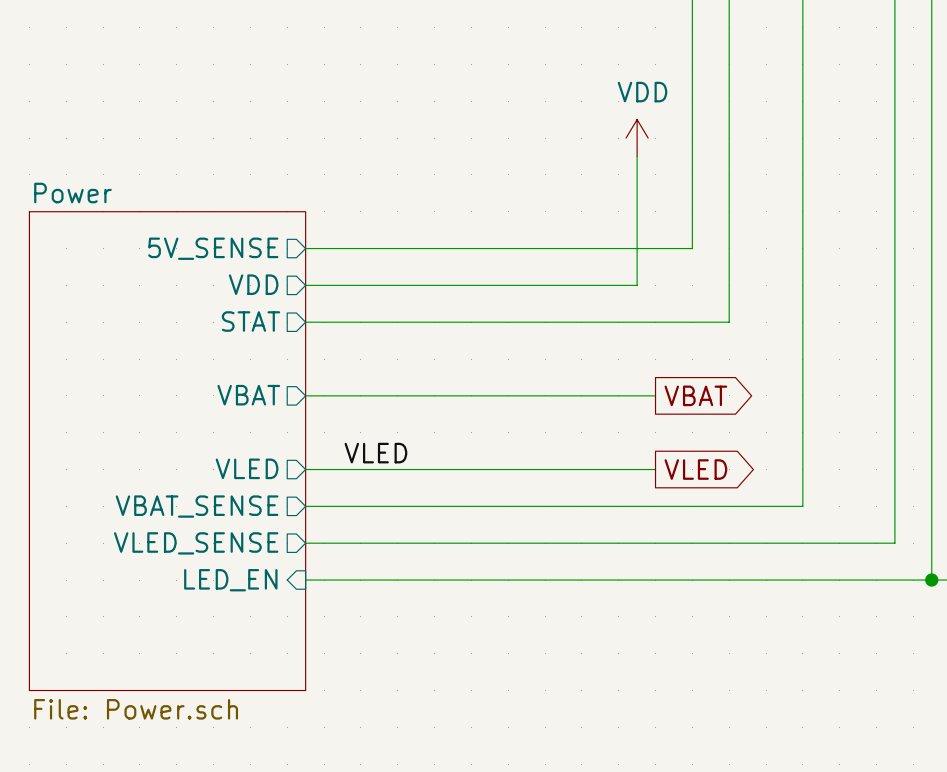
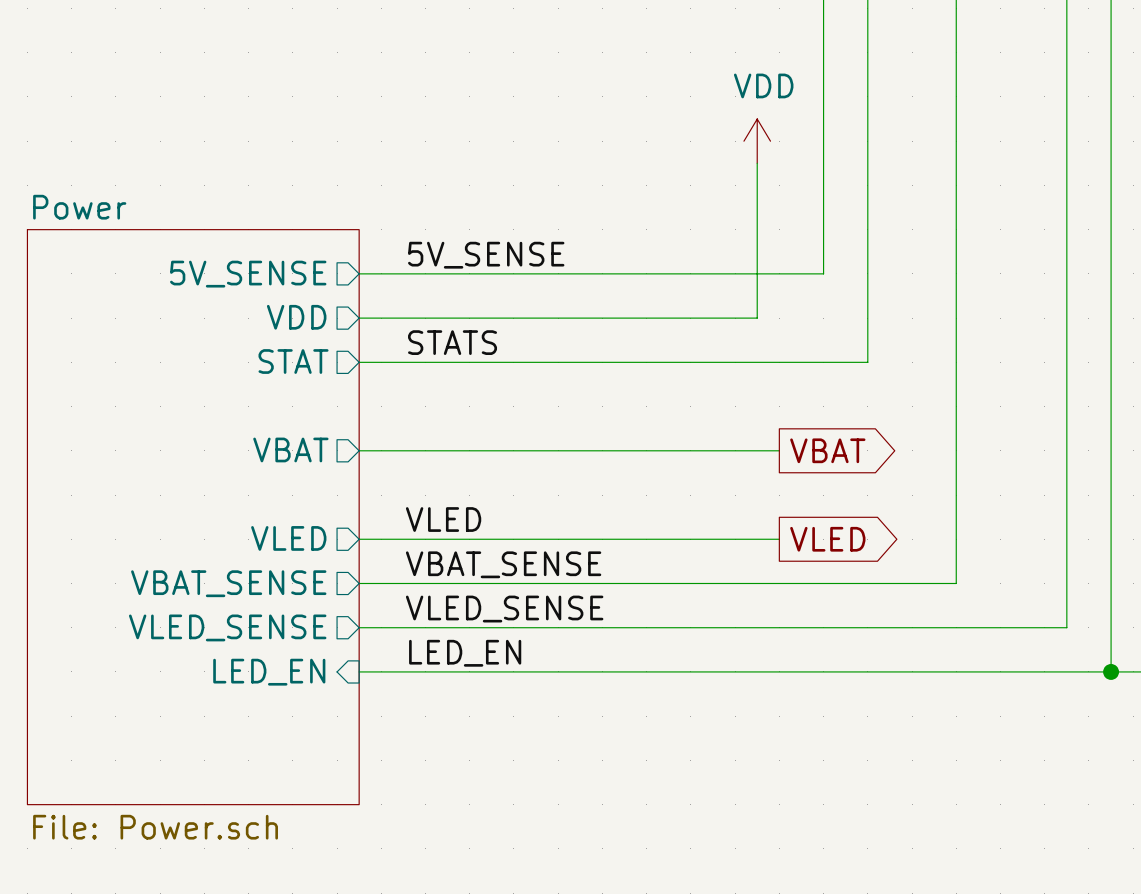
label: none -> 5V_SENSE (486, 255)
label: none -> STATS (452, 342)
label: none -> VBAT_SENSE (503, 564)
label: none -> VLED_SENSE (504, 609)
label: none -> LED_EN (465, 653)

